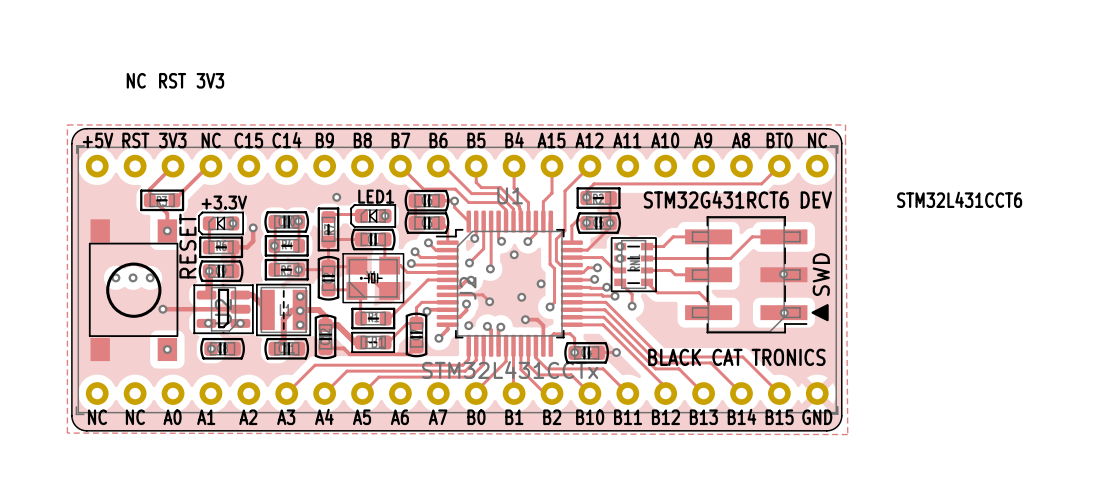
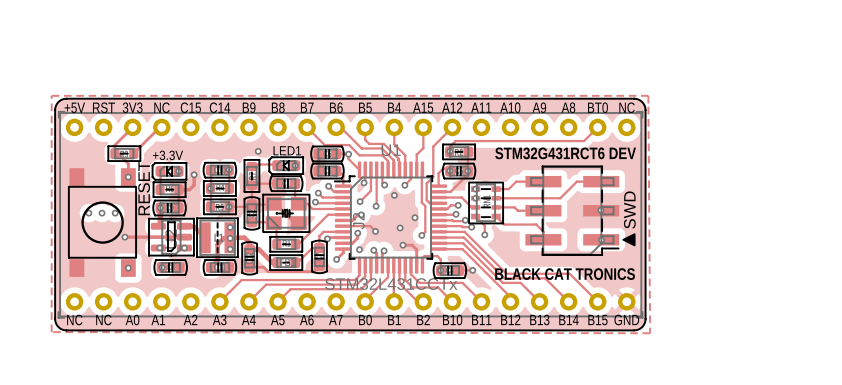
text: NC (136, 80) -> none
text: RST (172, 80) -> none
text: 3V3 (210, 80) -> none
text: STM32L431CCT6 (959, 199) -> none

